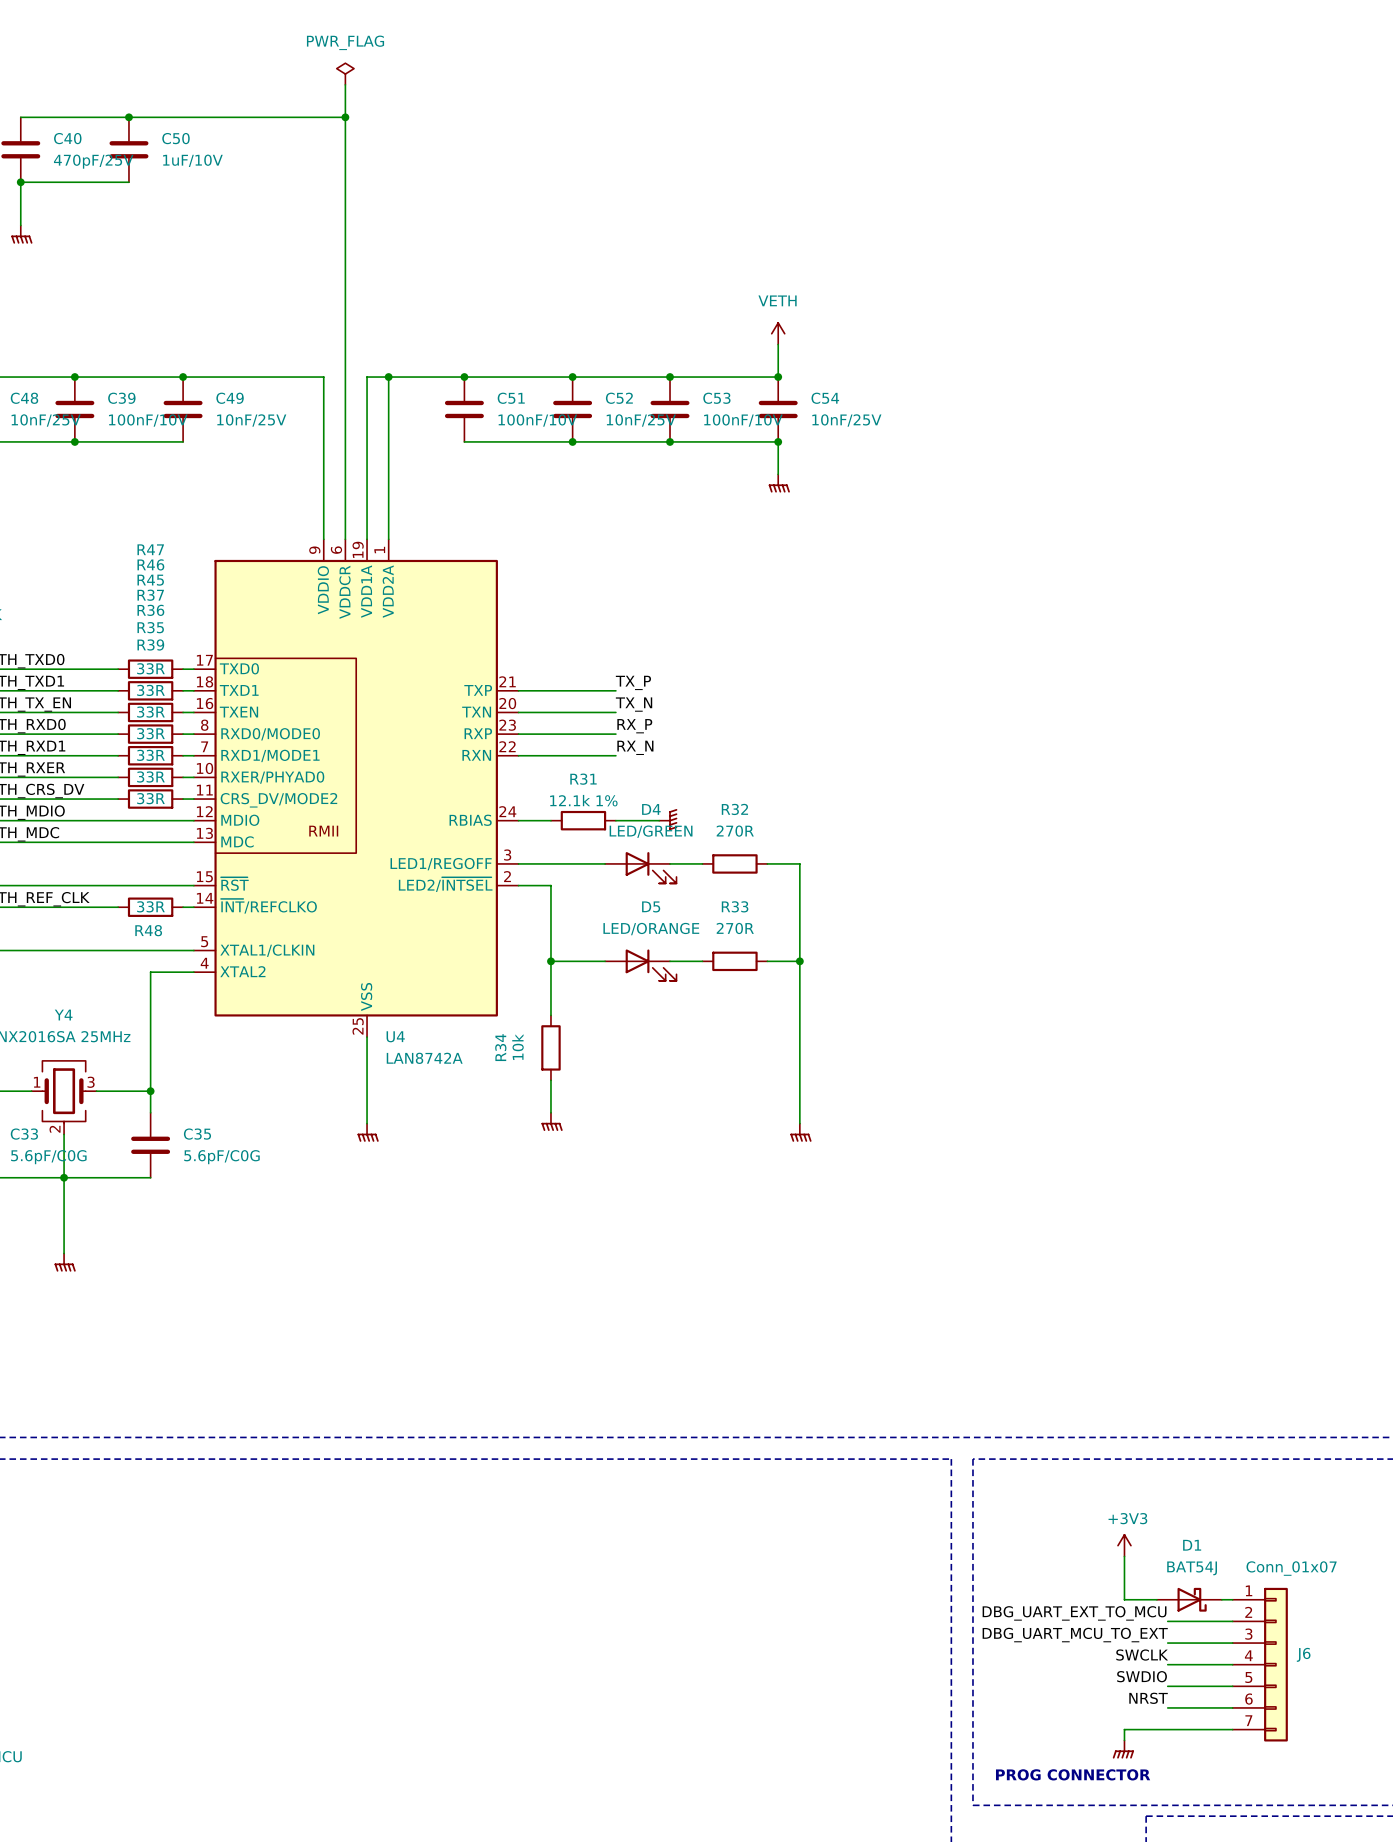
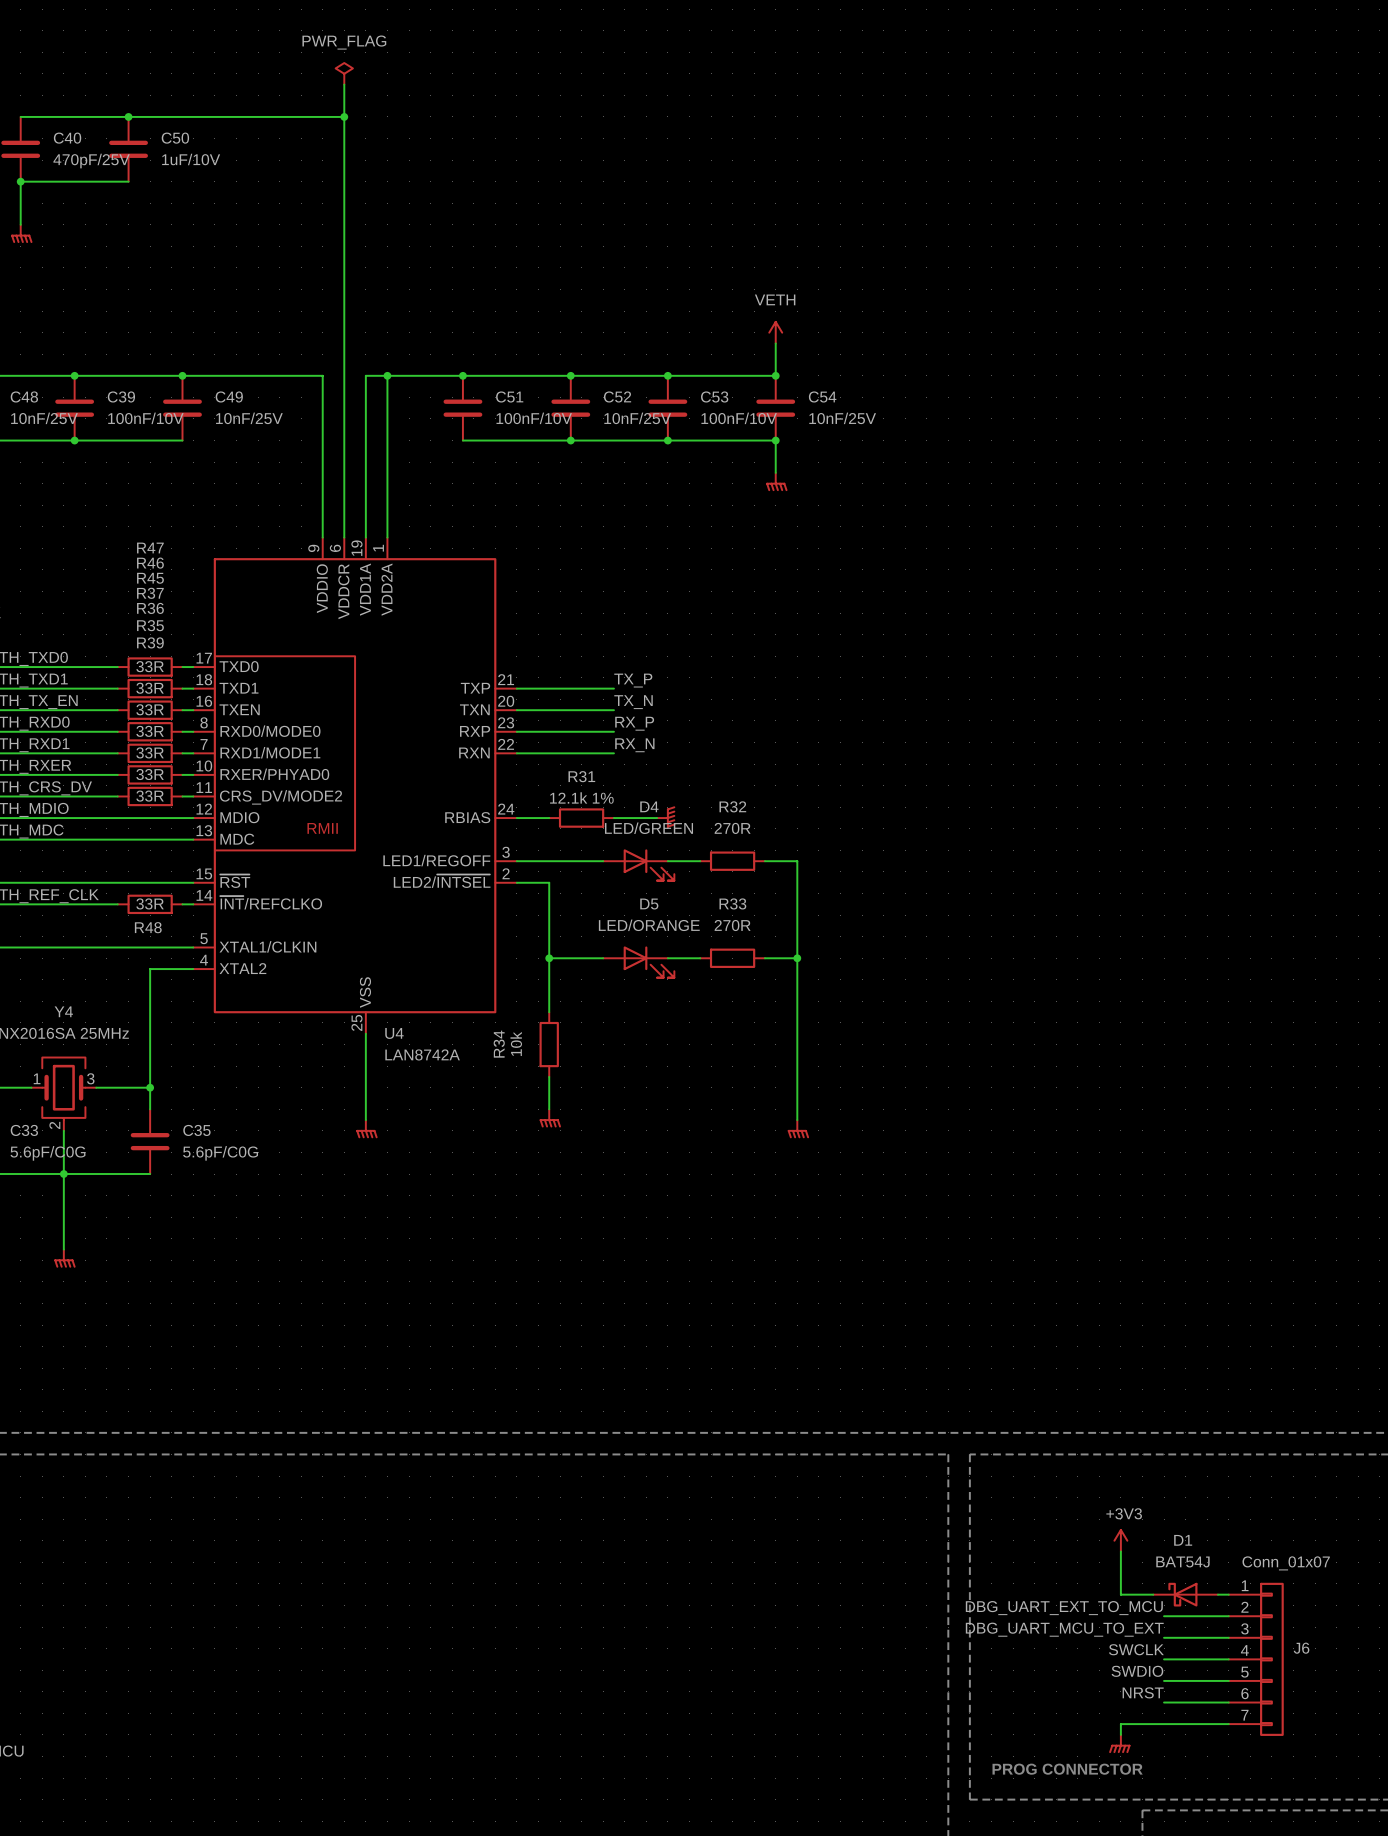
D1 rotation: 0° (1192, 1599) -> 180° (1182, 1594)

